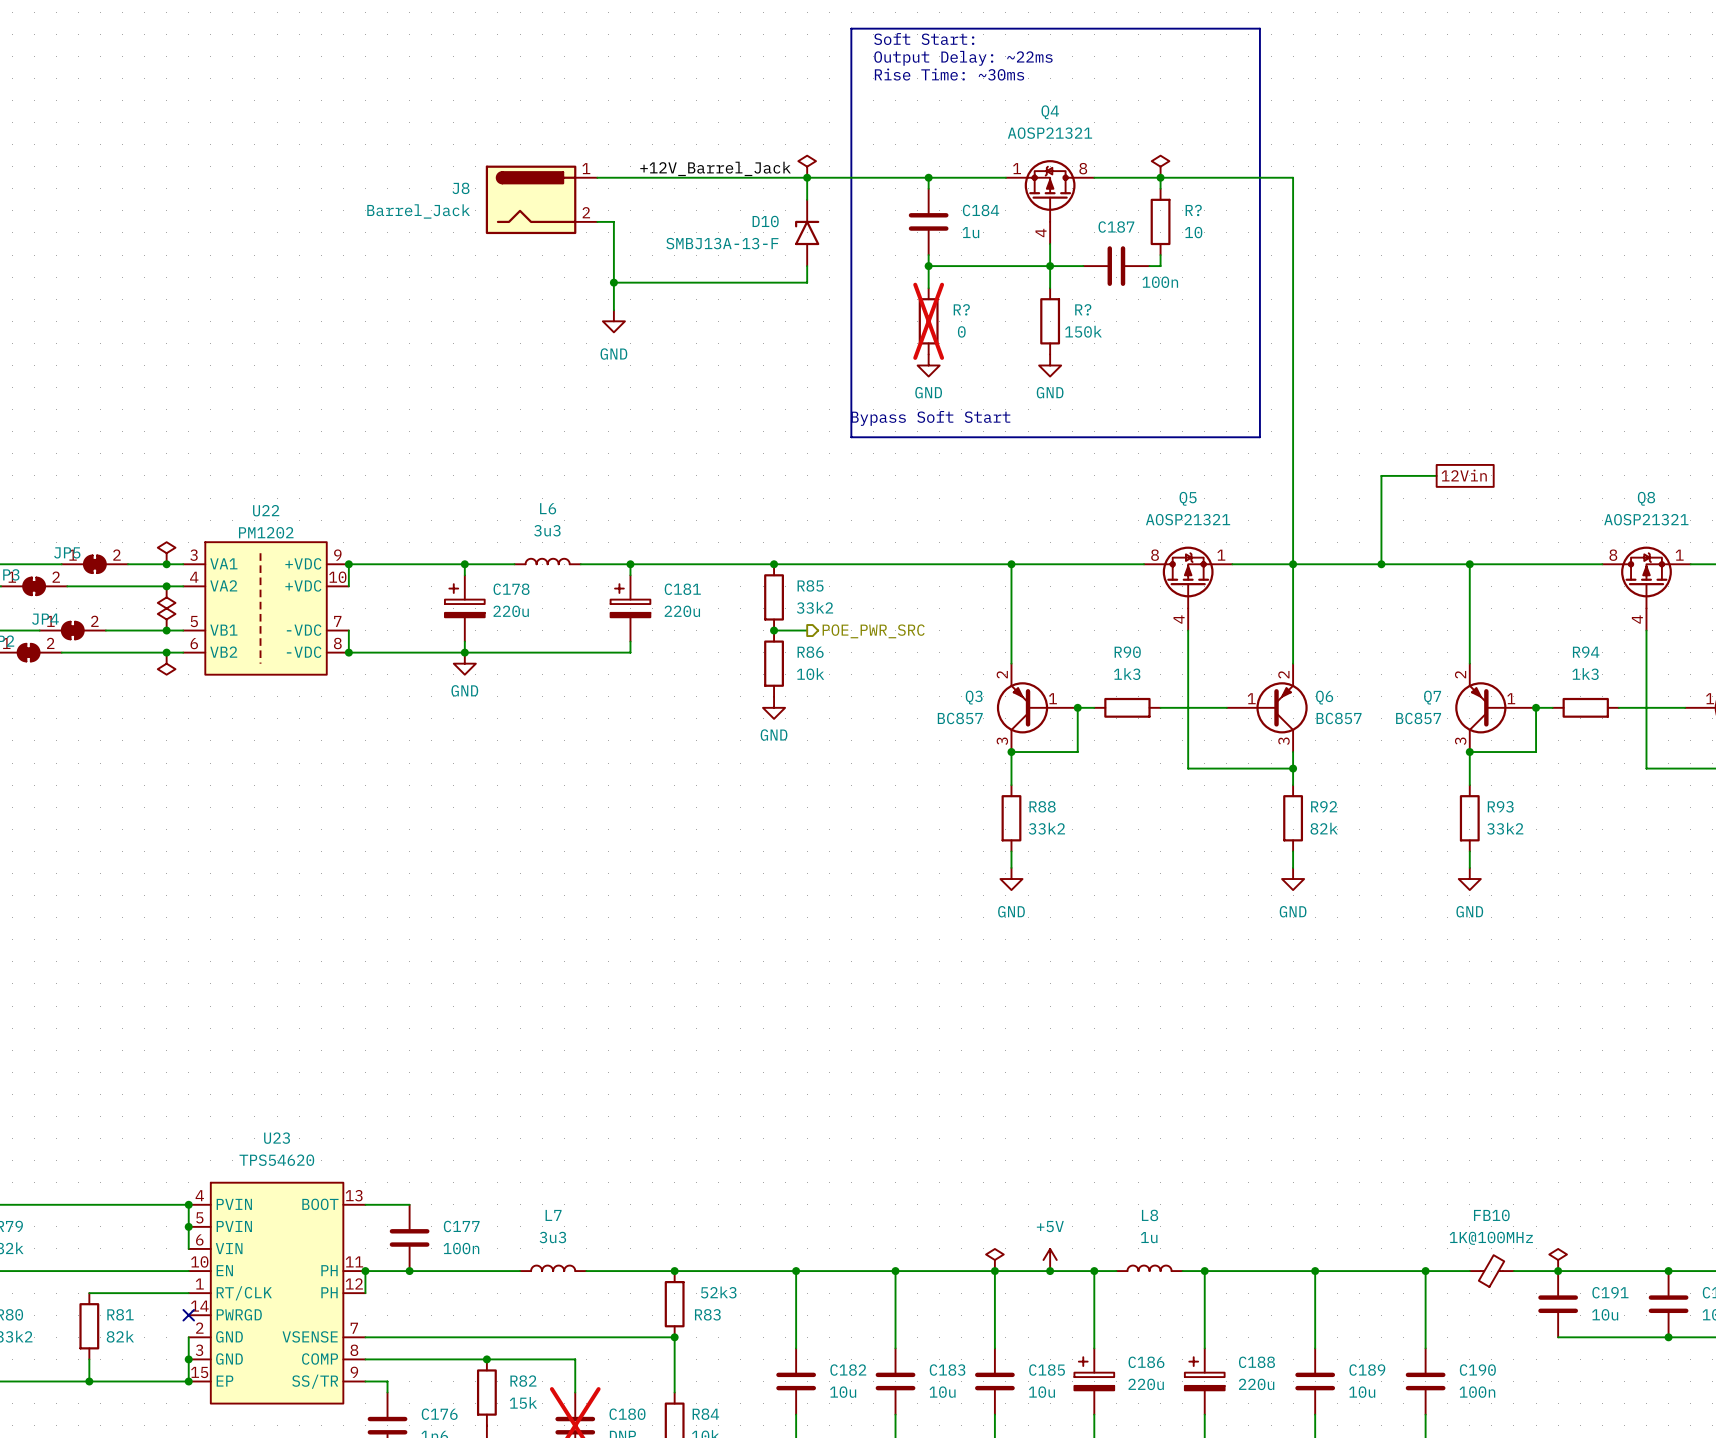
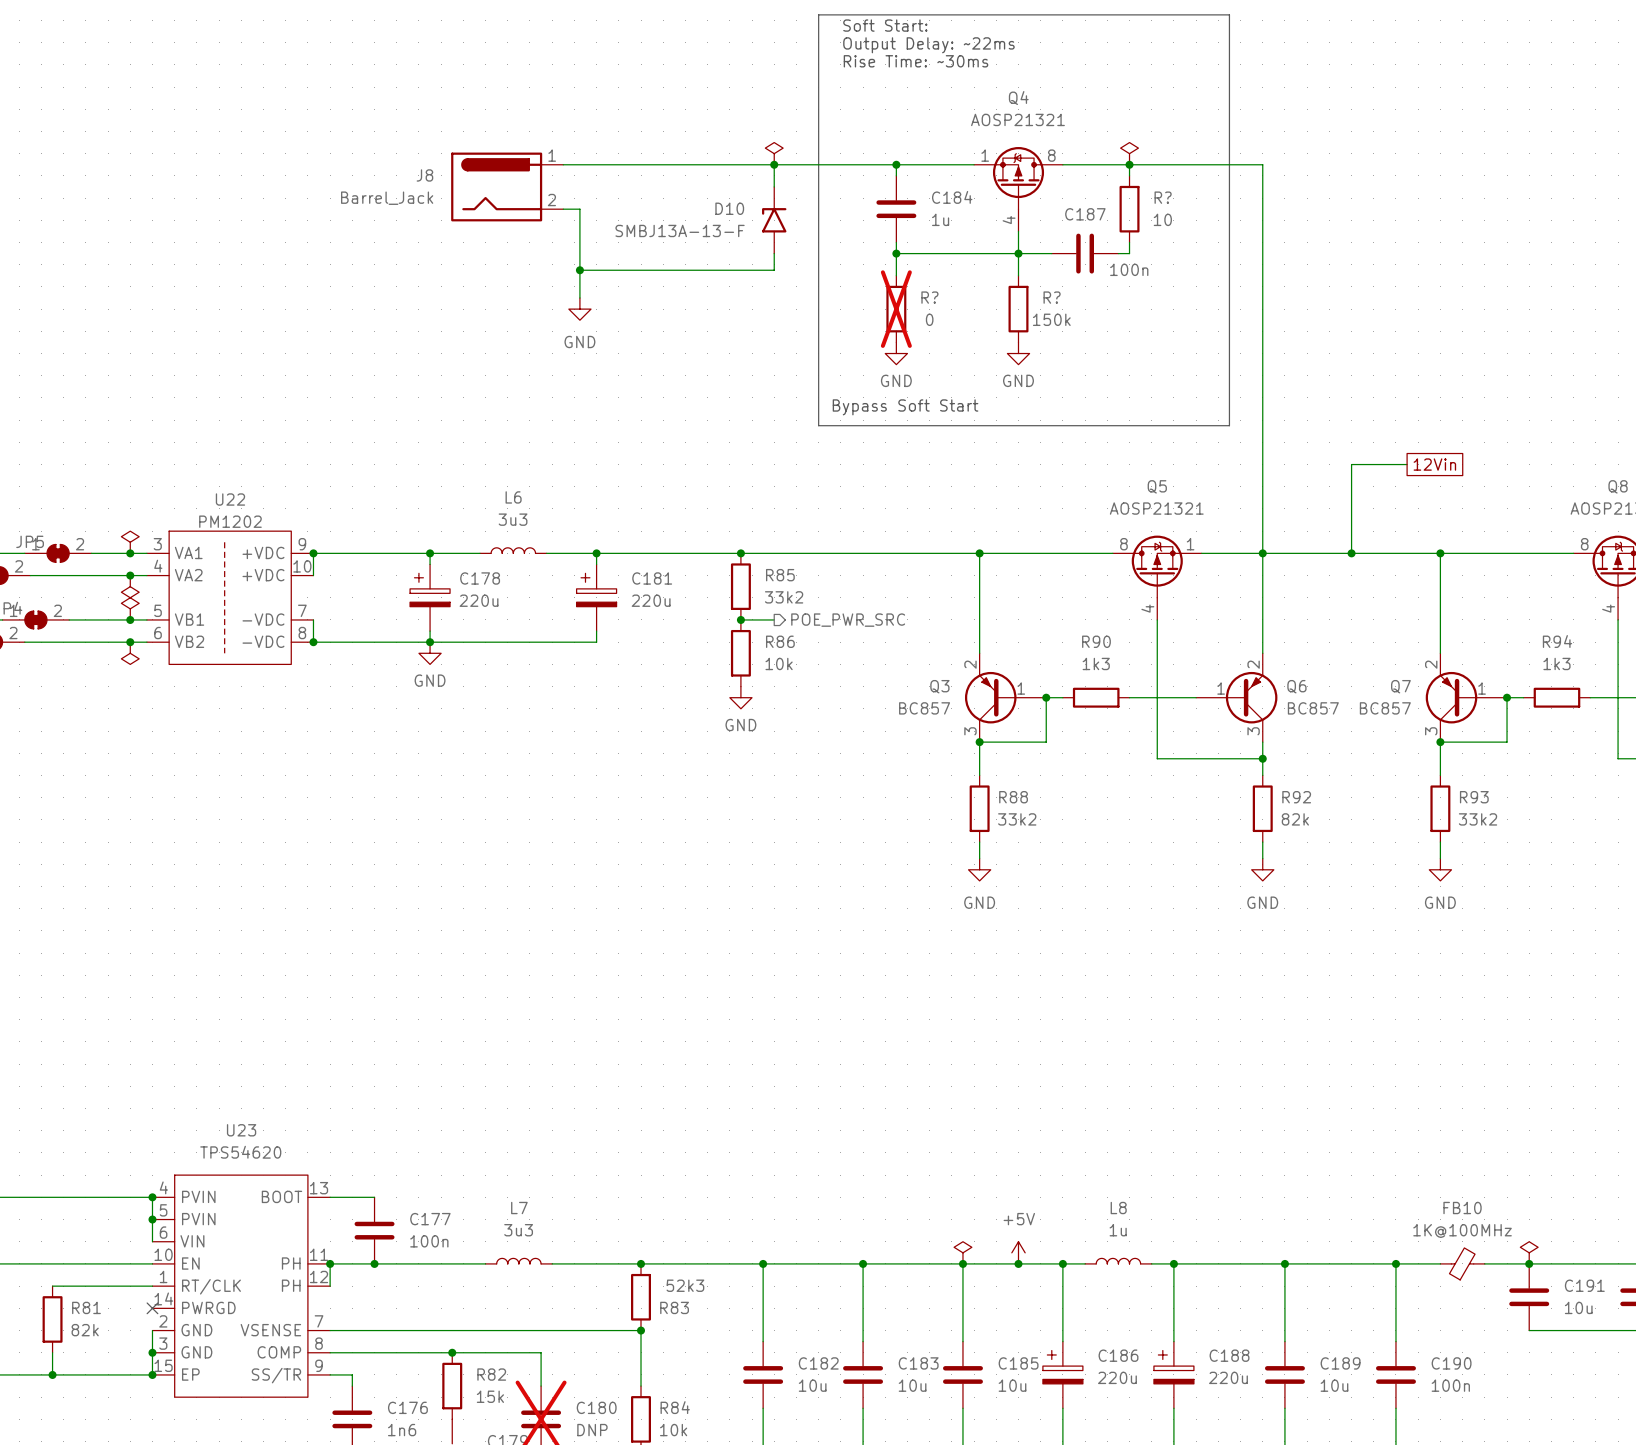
label: +12V_Barrel_Jack (715, 168) -> none

